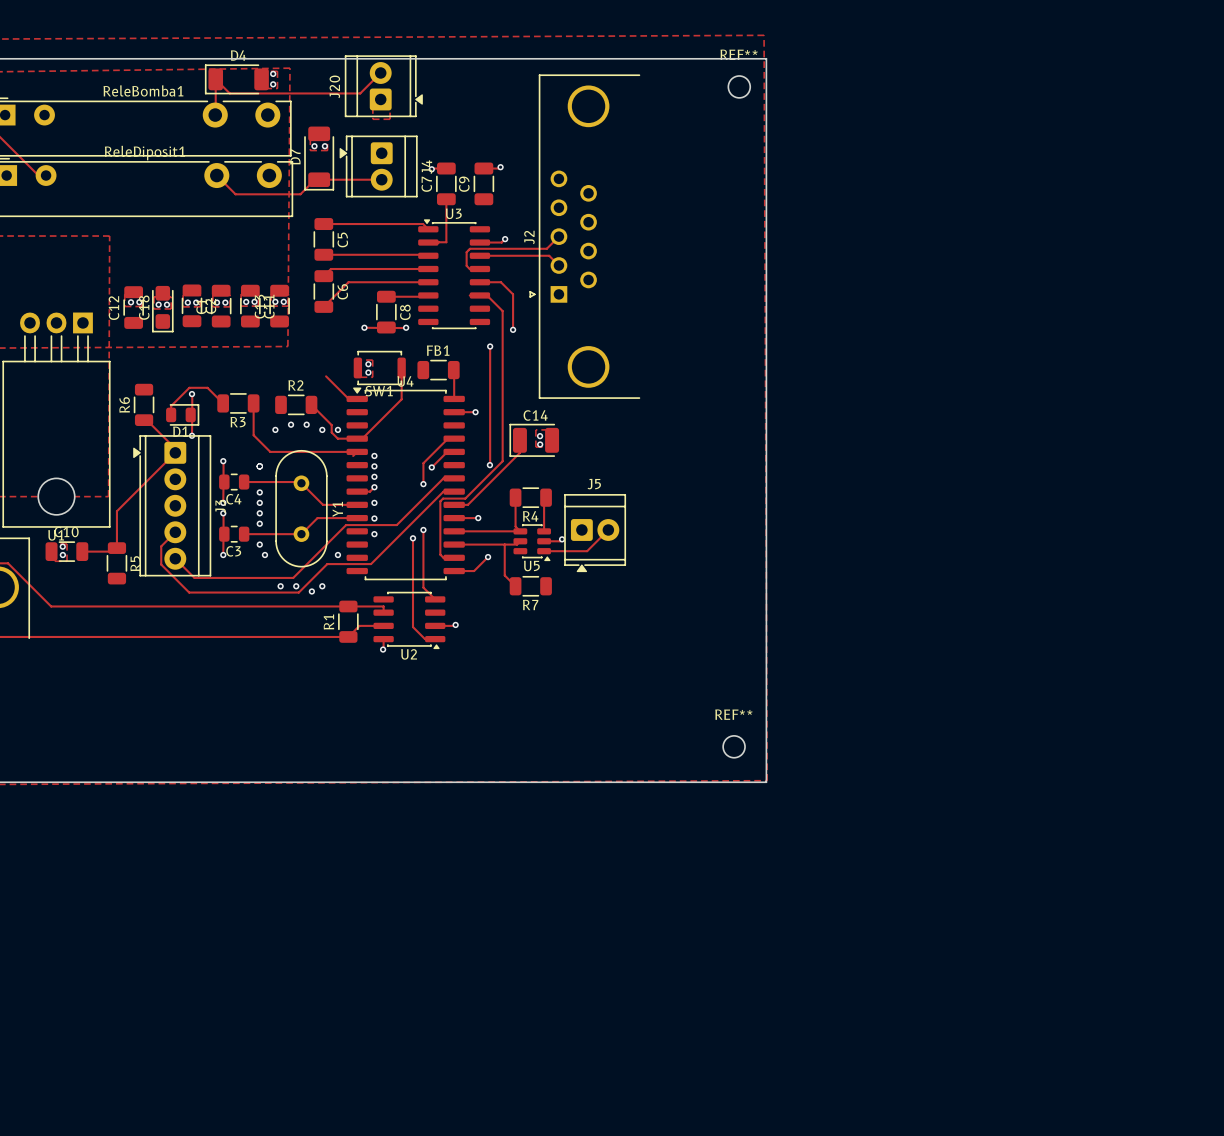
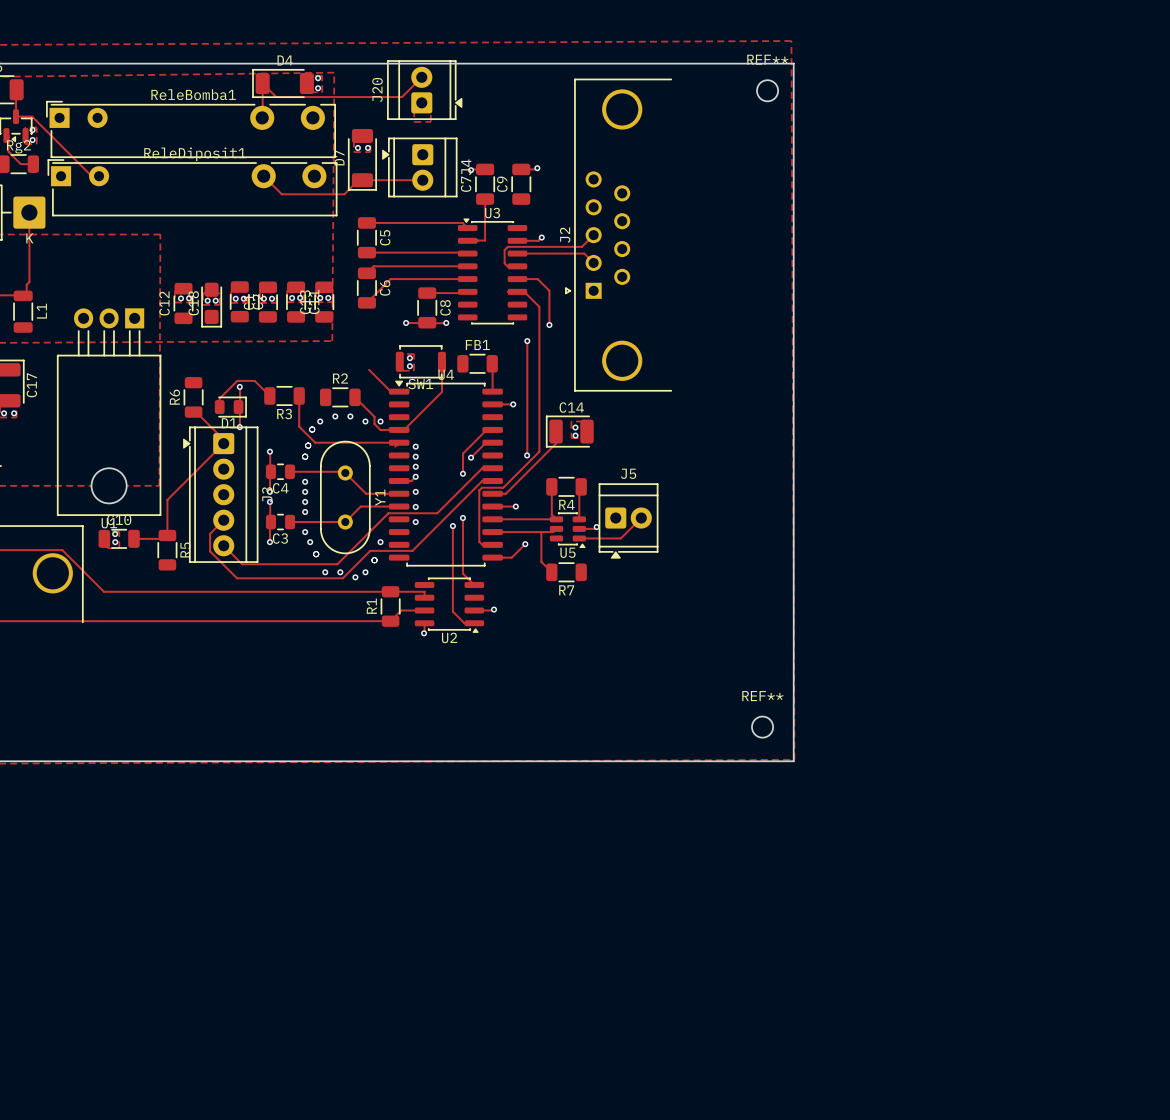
via: none -> (312, 429)
via: none -> (308, 445)
via: none -> (316, 554)
via: none -> (374, 560)

